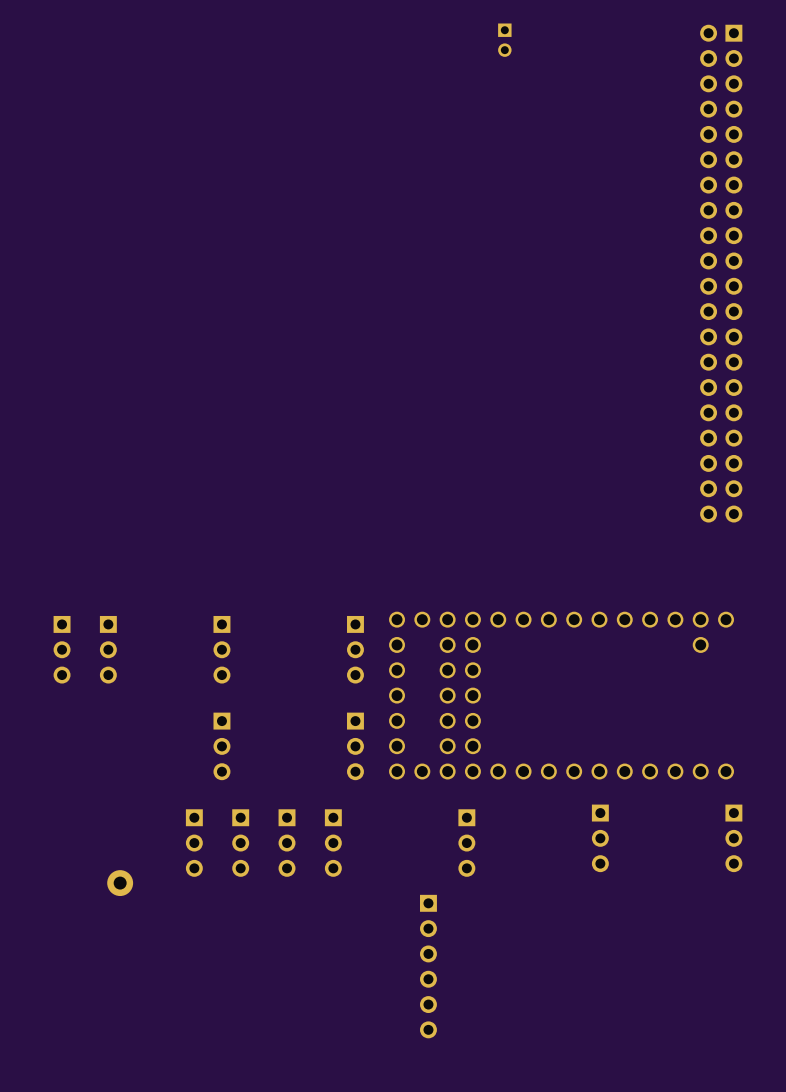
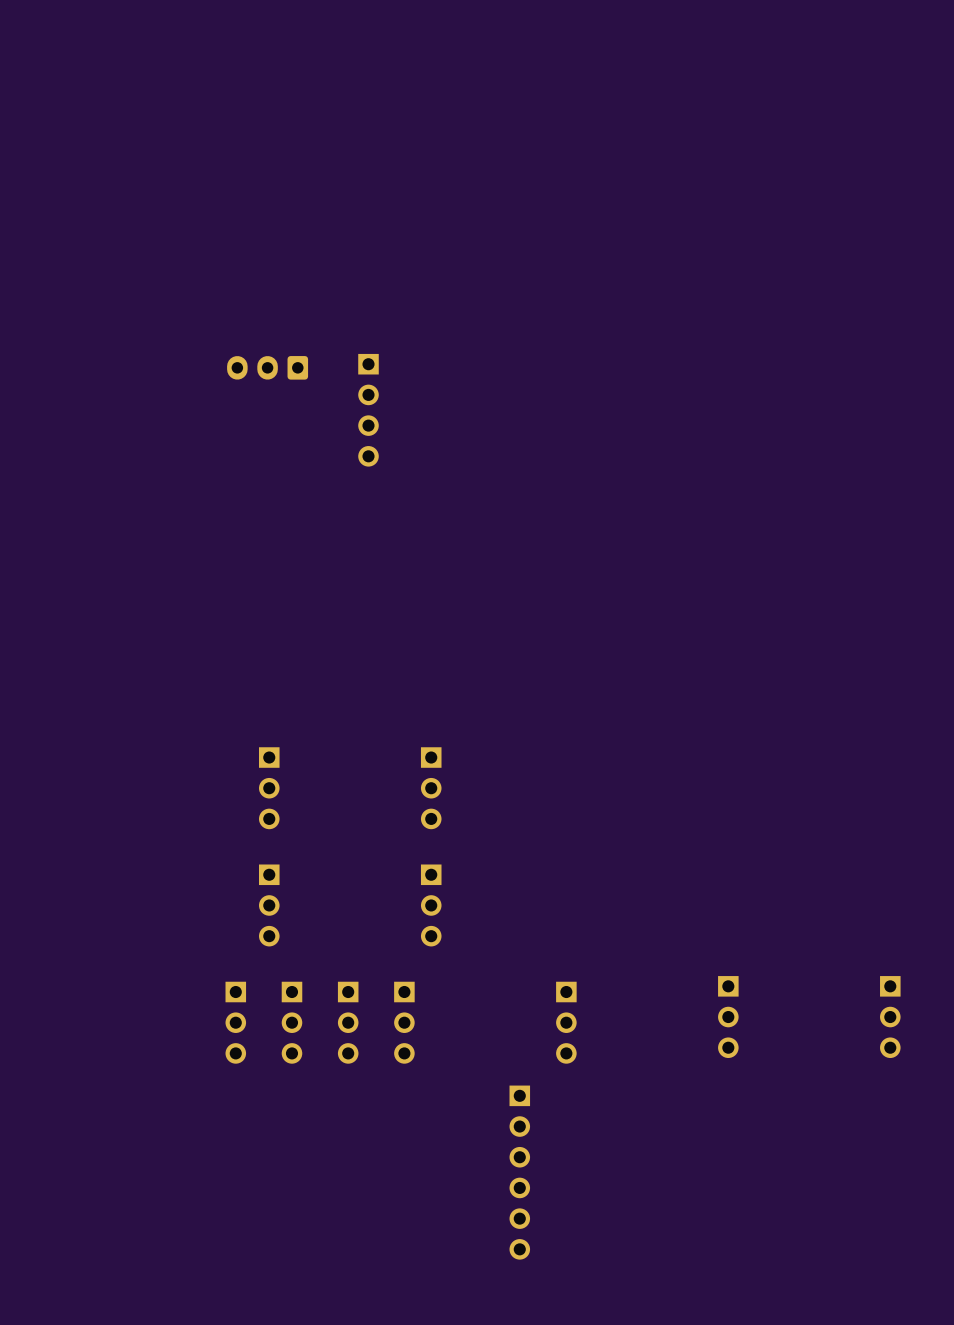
part: (504, 40) -> none
part: (721, 273) -> none
part: none -> (267, 367)
part: none -> (368, 410)
part: (62, 649) -> none
part: (108, 649) -> none
part: (561, 695) -> none
part: (120, 883) -> none

